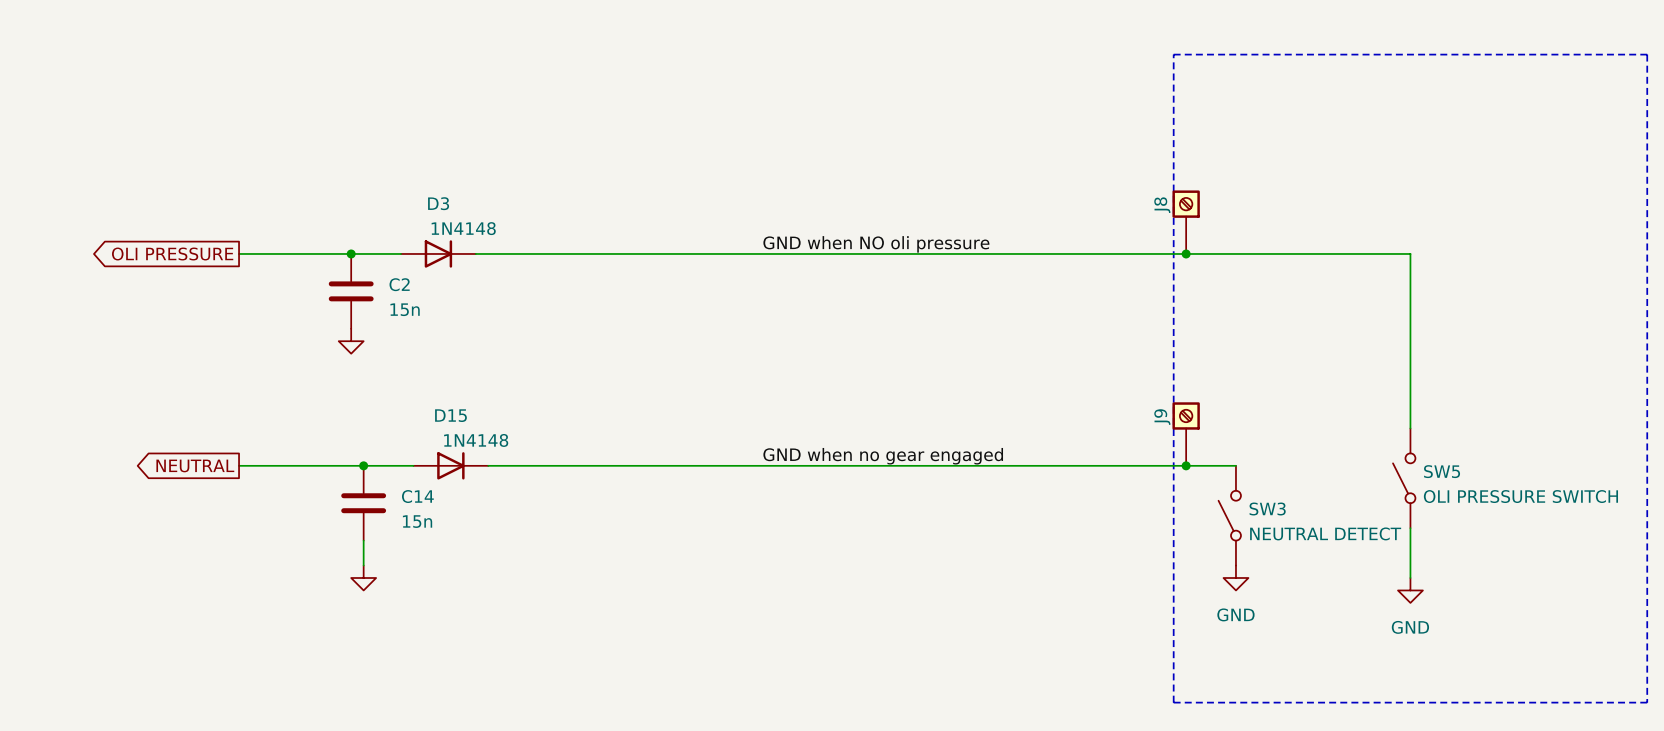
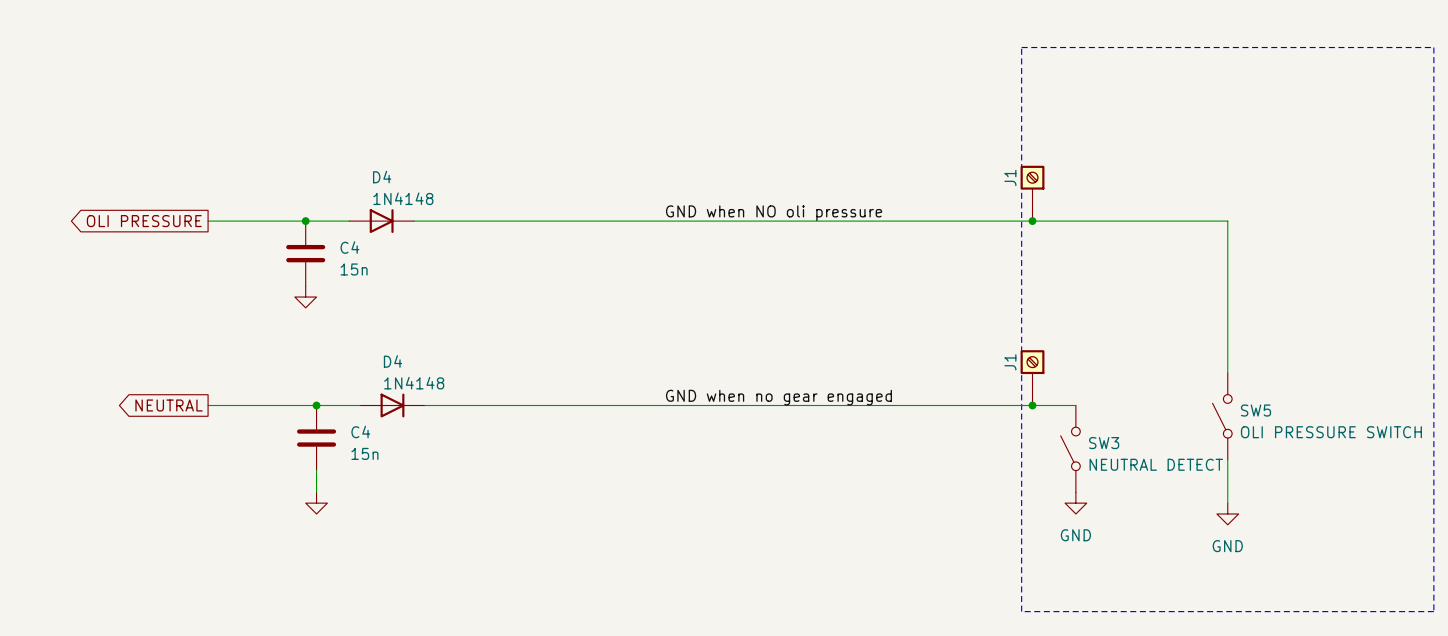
D3 name: D3 (438, 203) -> D4 (382, 177)
J8 name: J8 (1162, 205) -> J1 (1010, 177)
C2 name: C2 (399, 284) -> C4 (349, 247)
D15 name: D15 (450, 415) -> D4 (393, 361)
J9 name: J9 (1162, 417) -> J1 (1010, 362)
C14 name: C14 (417, 496) -> C4 (360, 431)

